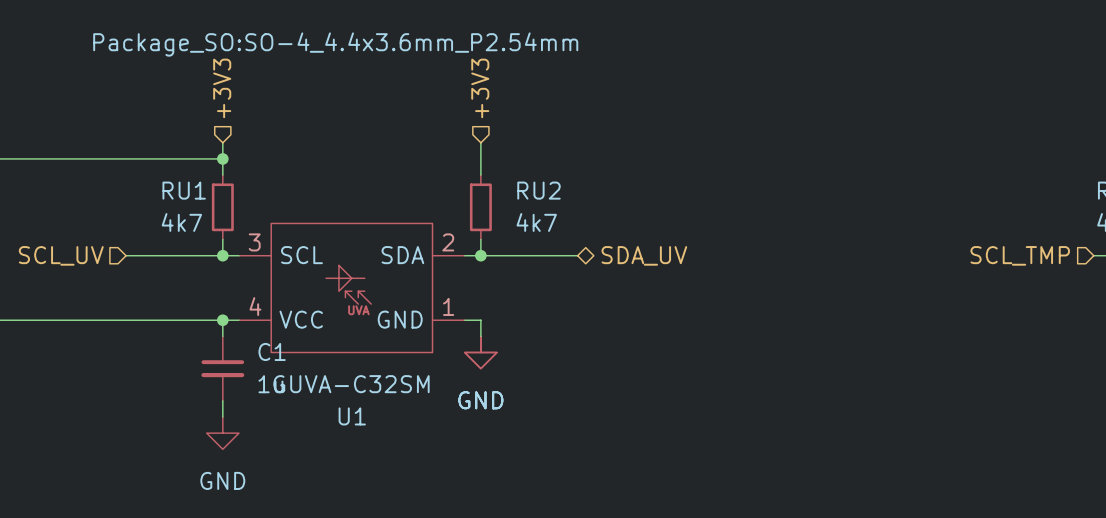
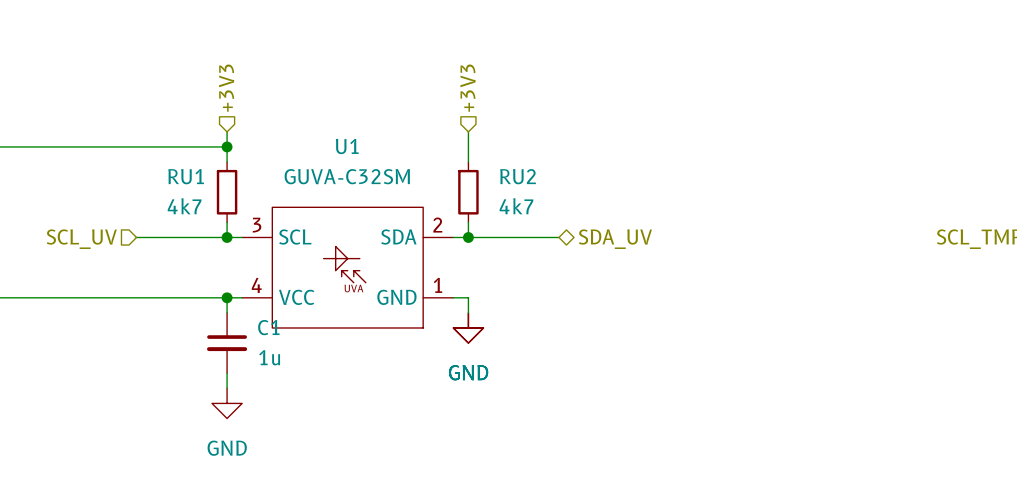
U1 text: Package_SO:SO-4_4.4x3.6mm_P2.54mm (335, 44) -> none
U1 value position: GUVA-C32SM (351, 384) -> GUVA-C32SM (347, 176)
U1 name position: U1 (352, 416) -> U1 (347, 146)

